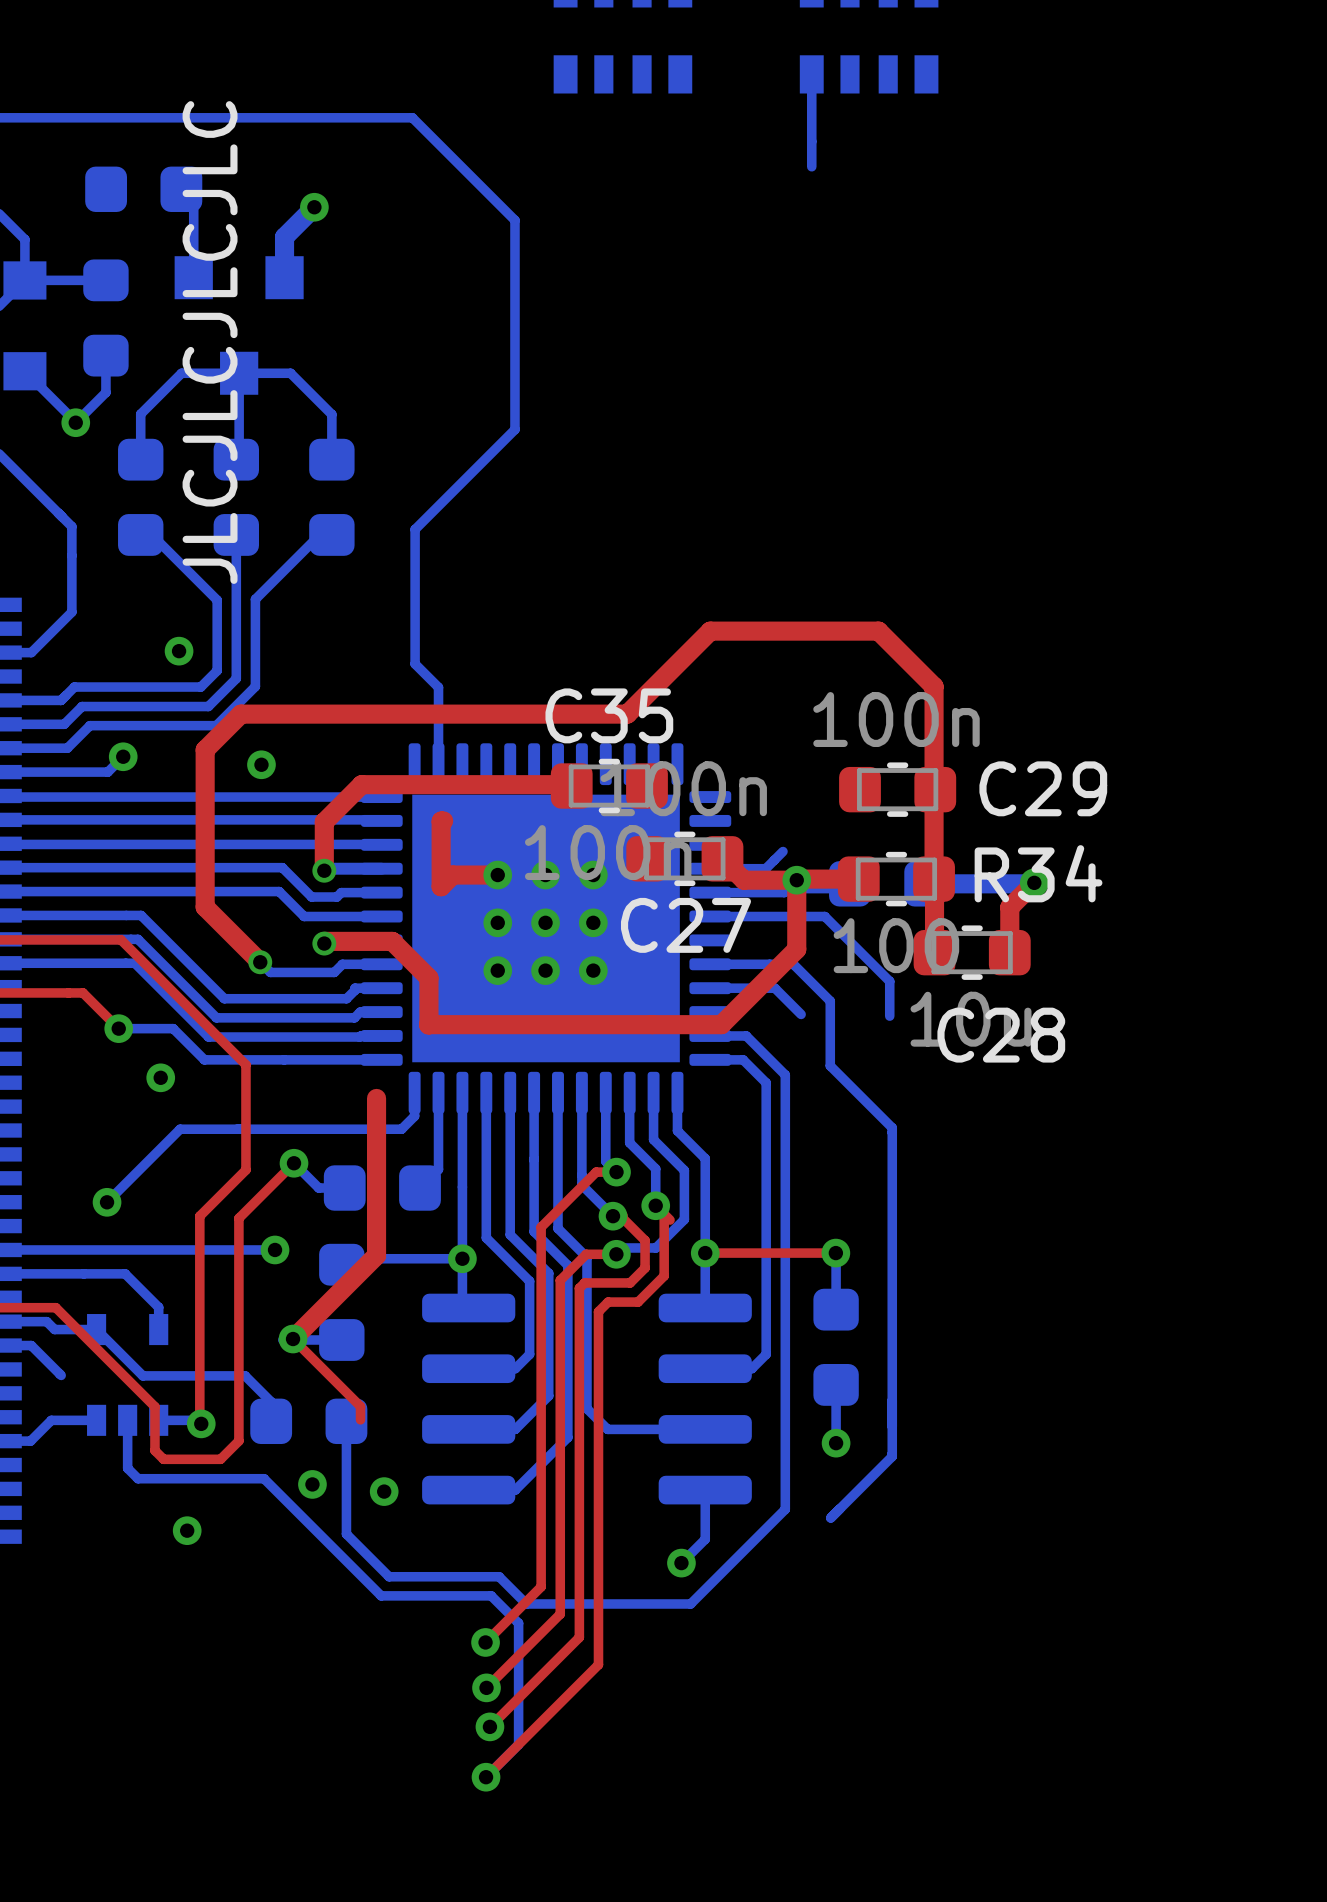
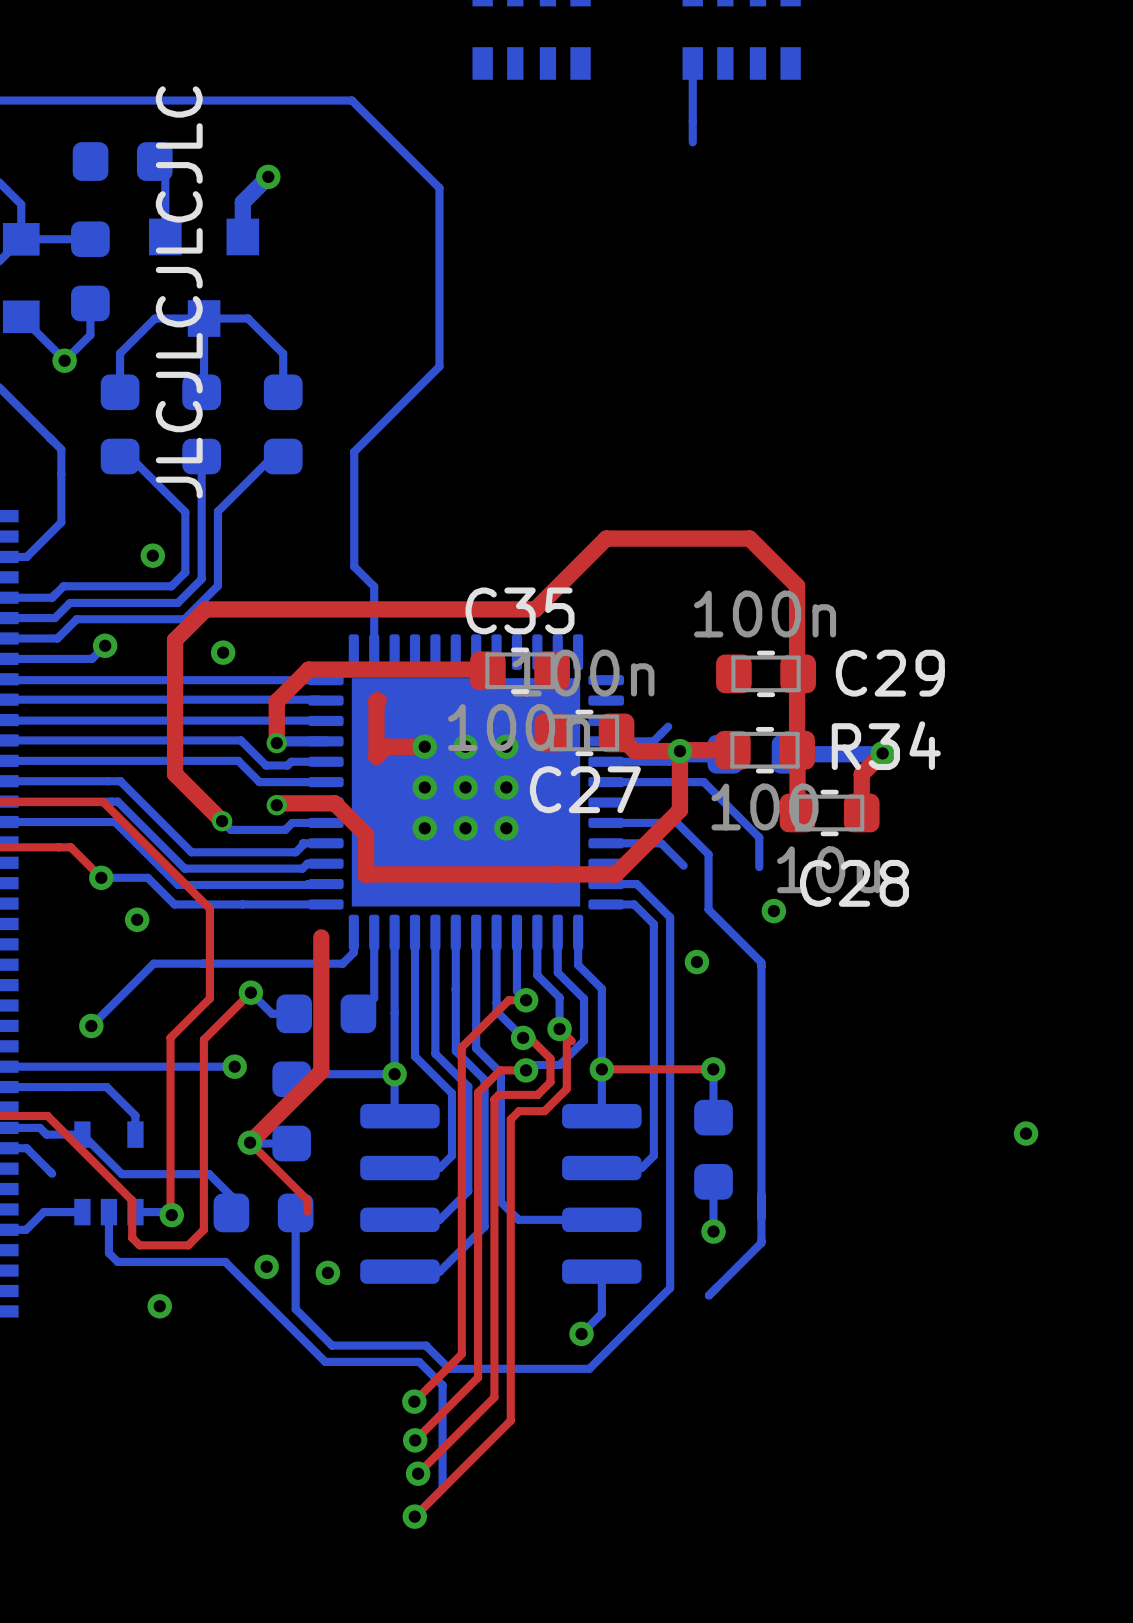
via: none -> (773, 911)
via: none -> (696, 962)
via: none -> (1026, 1133)

